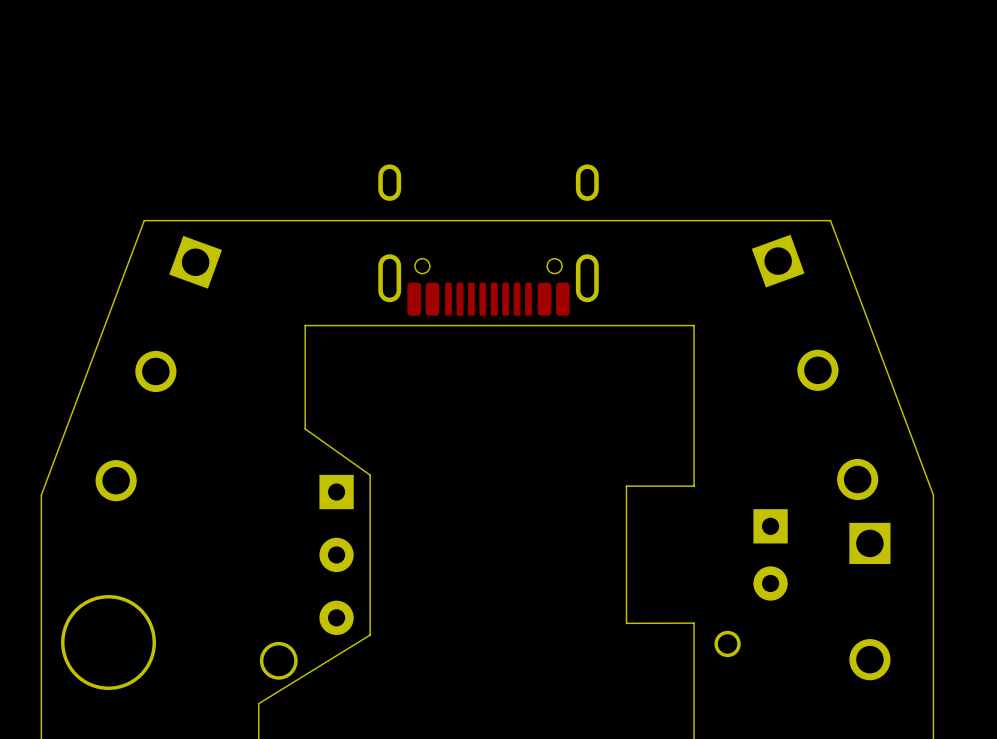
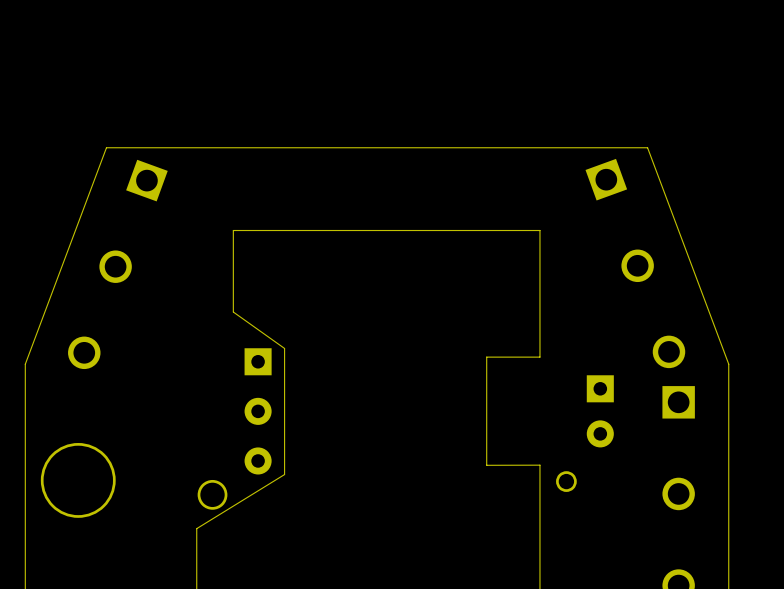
part: (488, 240) -> none

